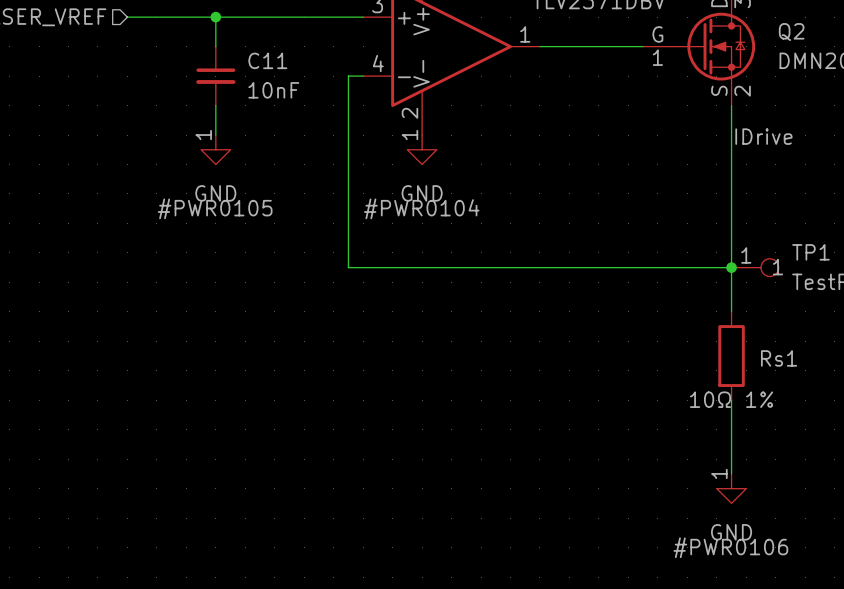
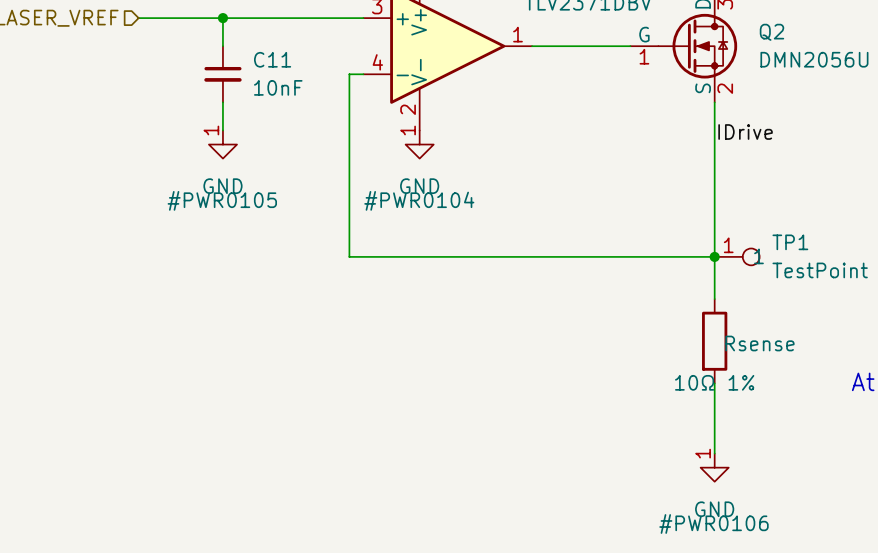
Rs1 name: Rs1 (779, 358) -> Rsense (759, 343)

